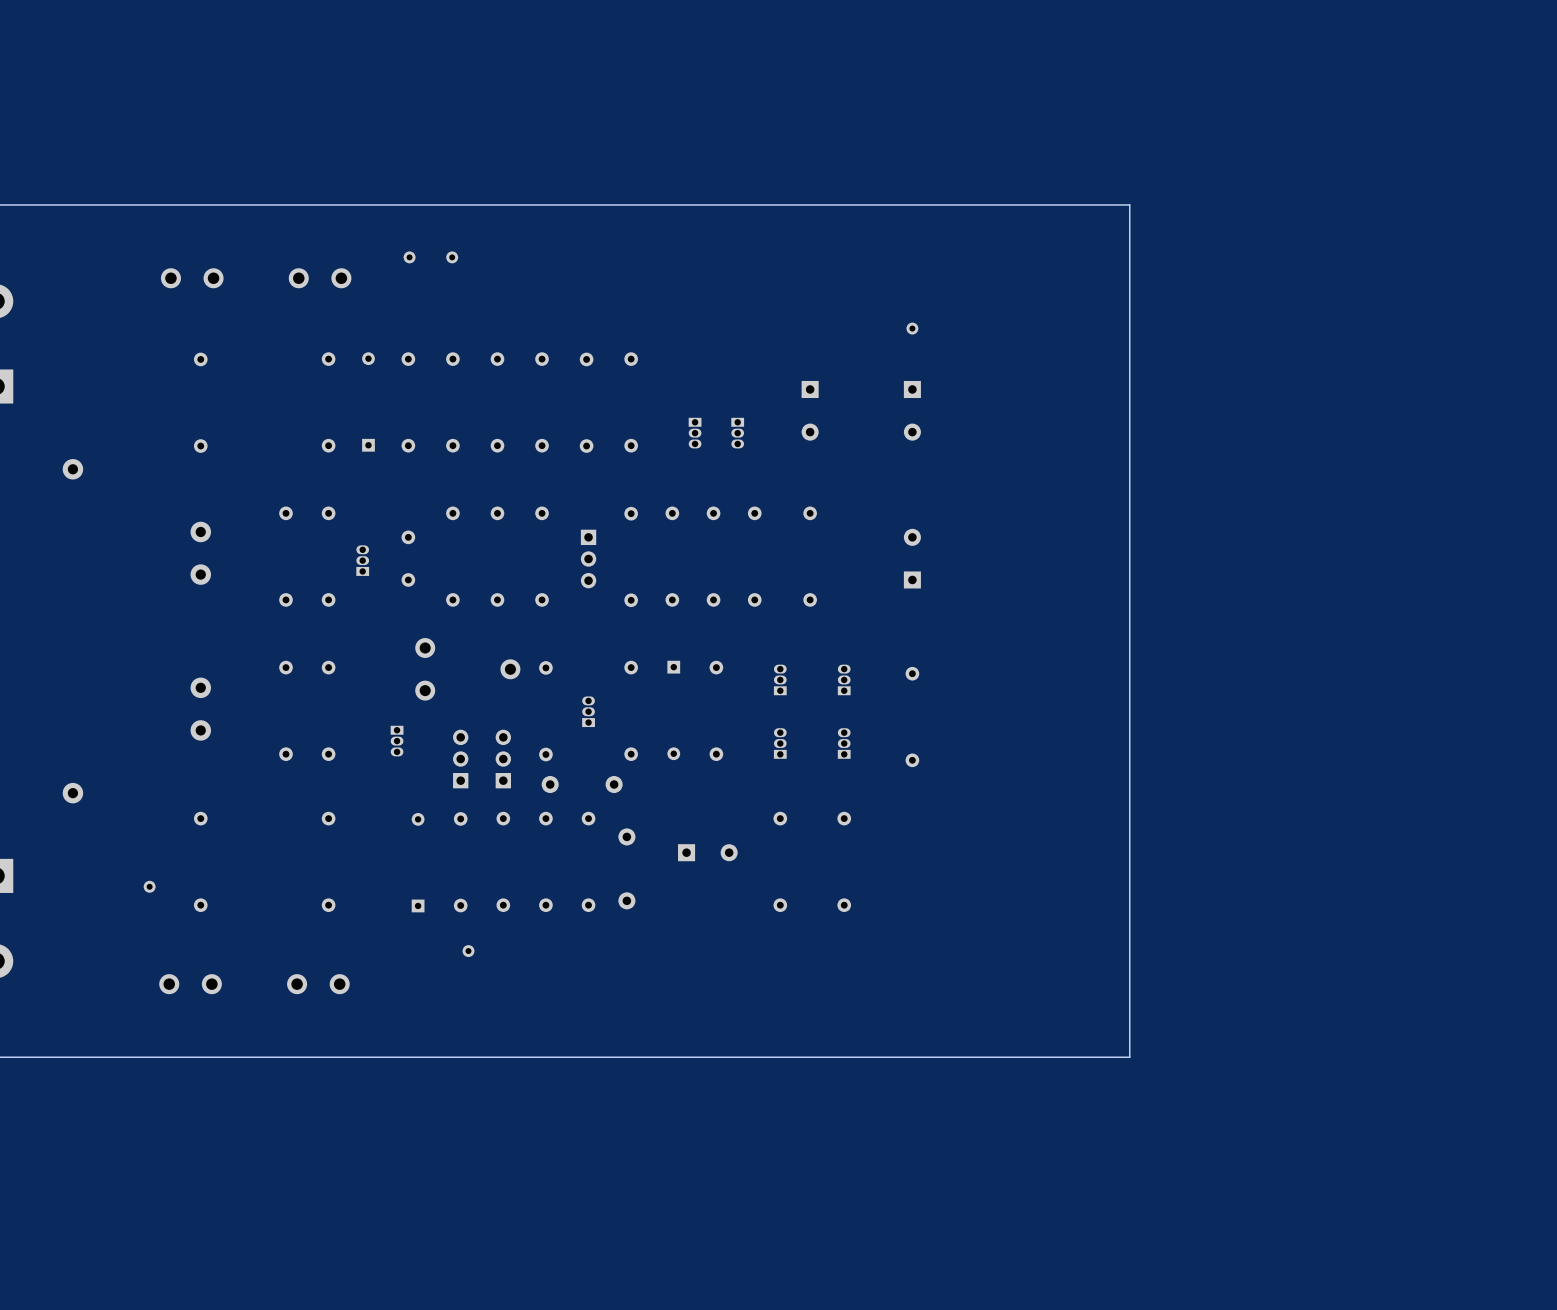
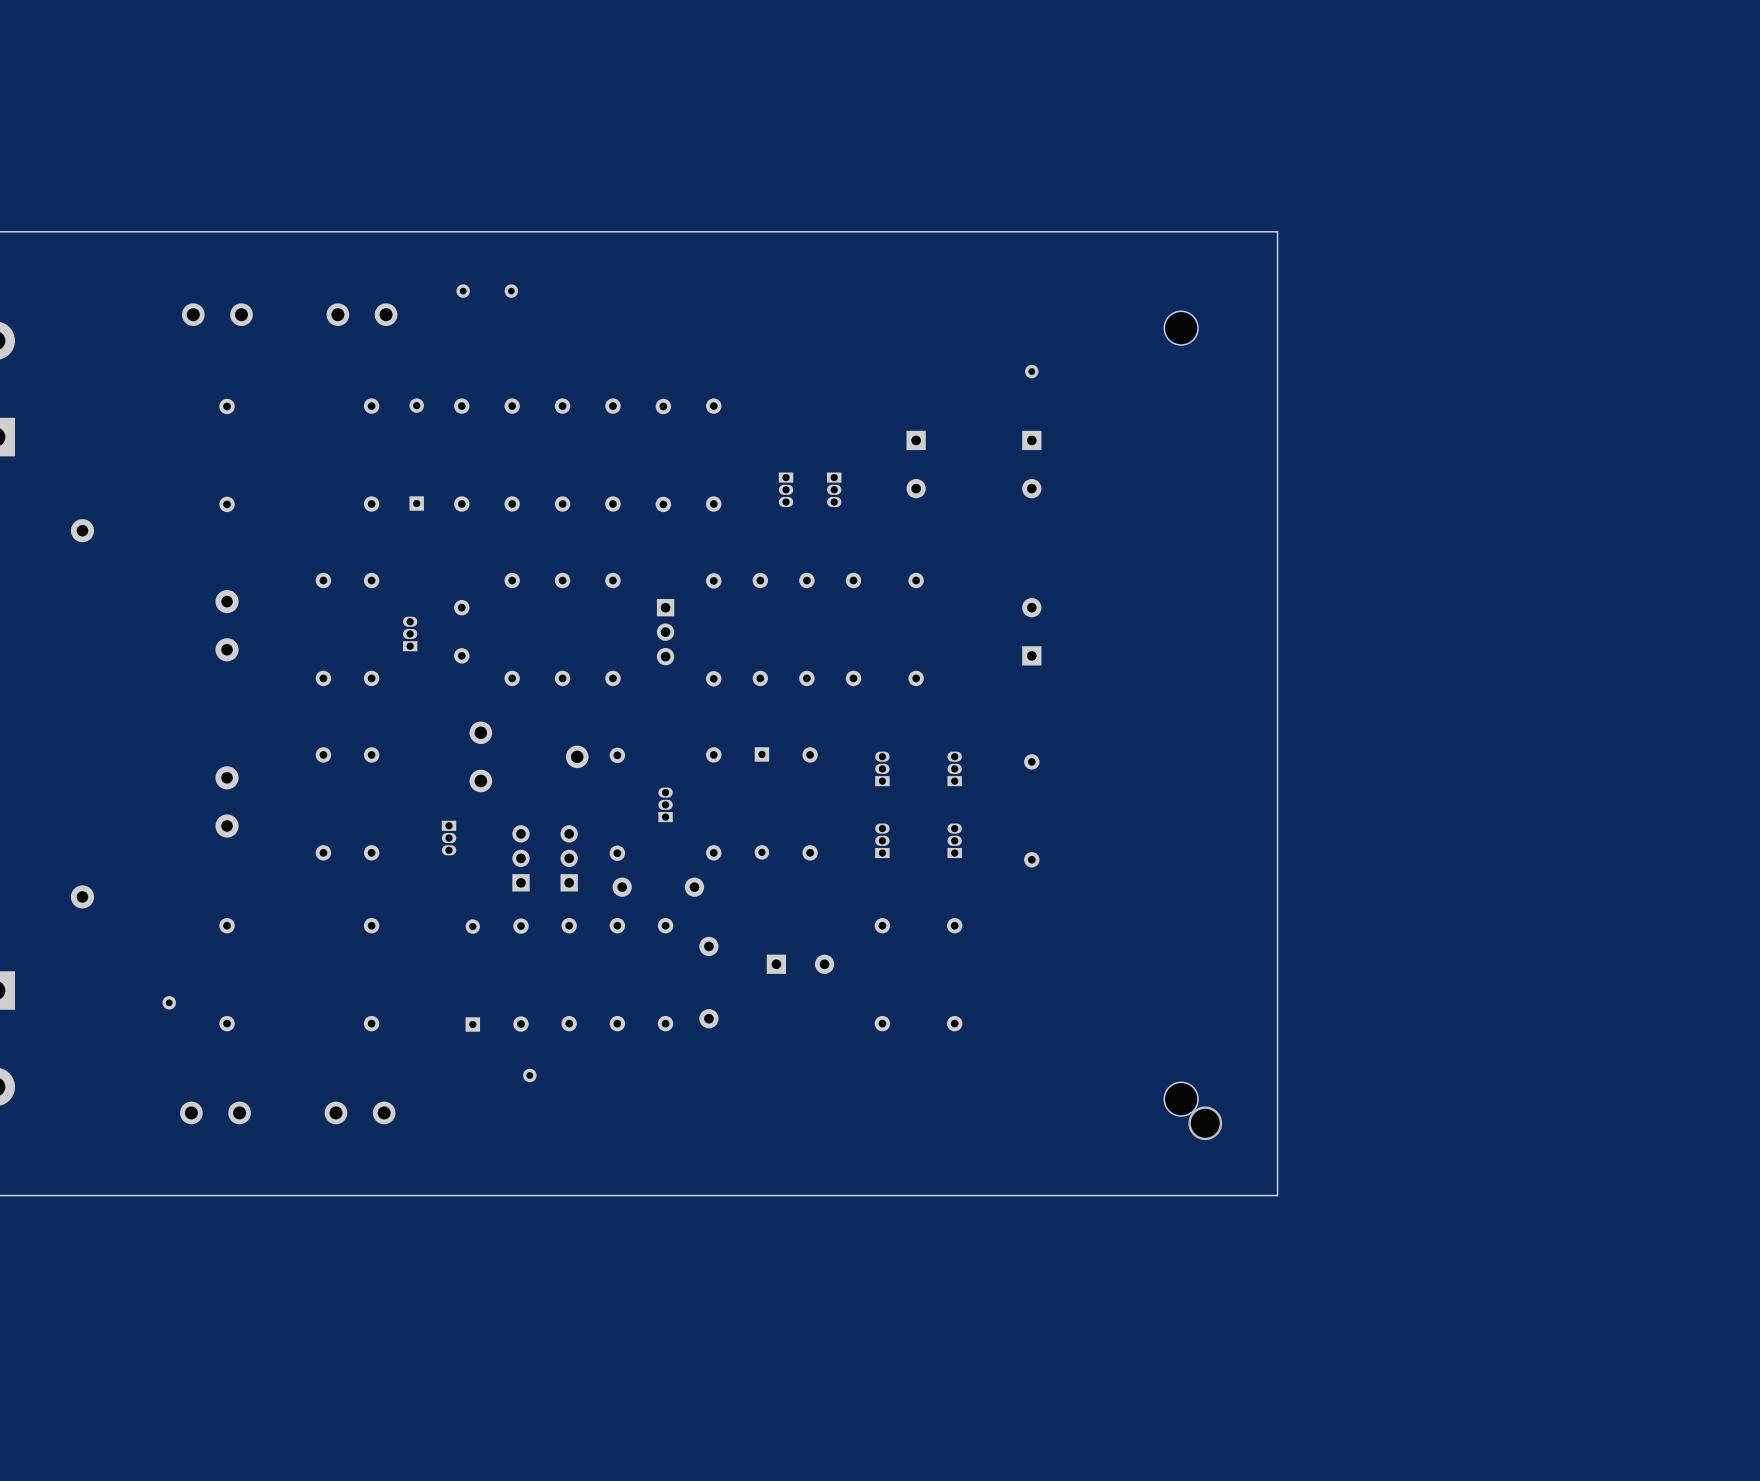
part: none -> (1181, 328)
part: none -> (1181, 1099)
via: none -> (1205, 1123)

